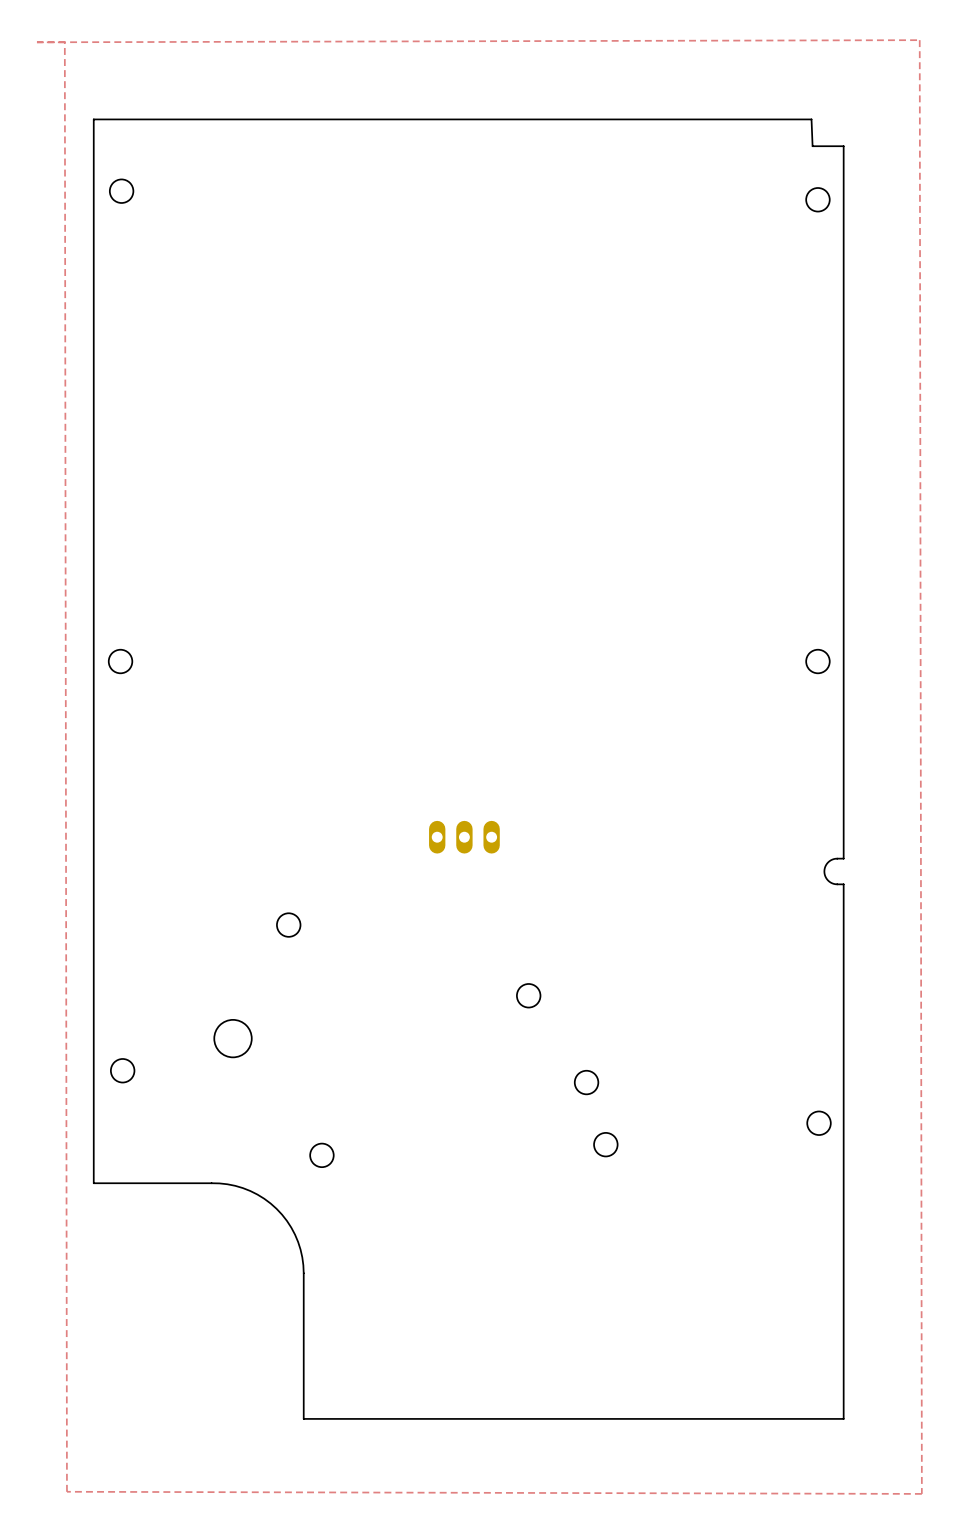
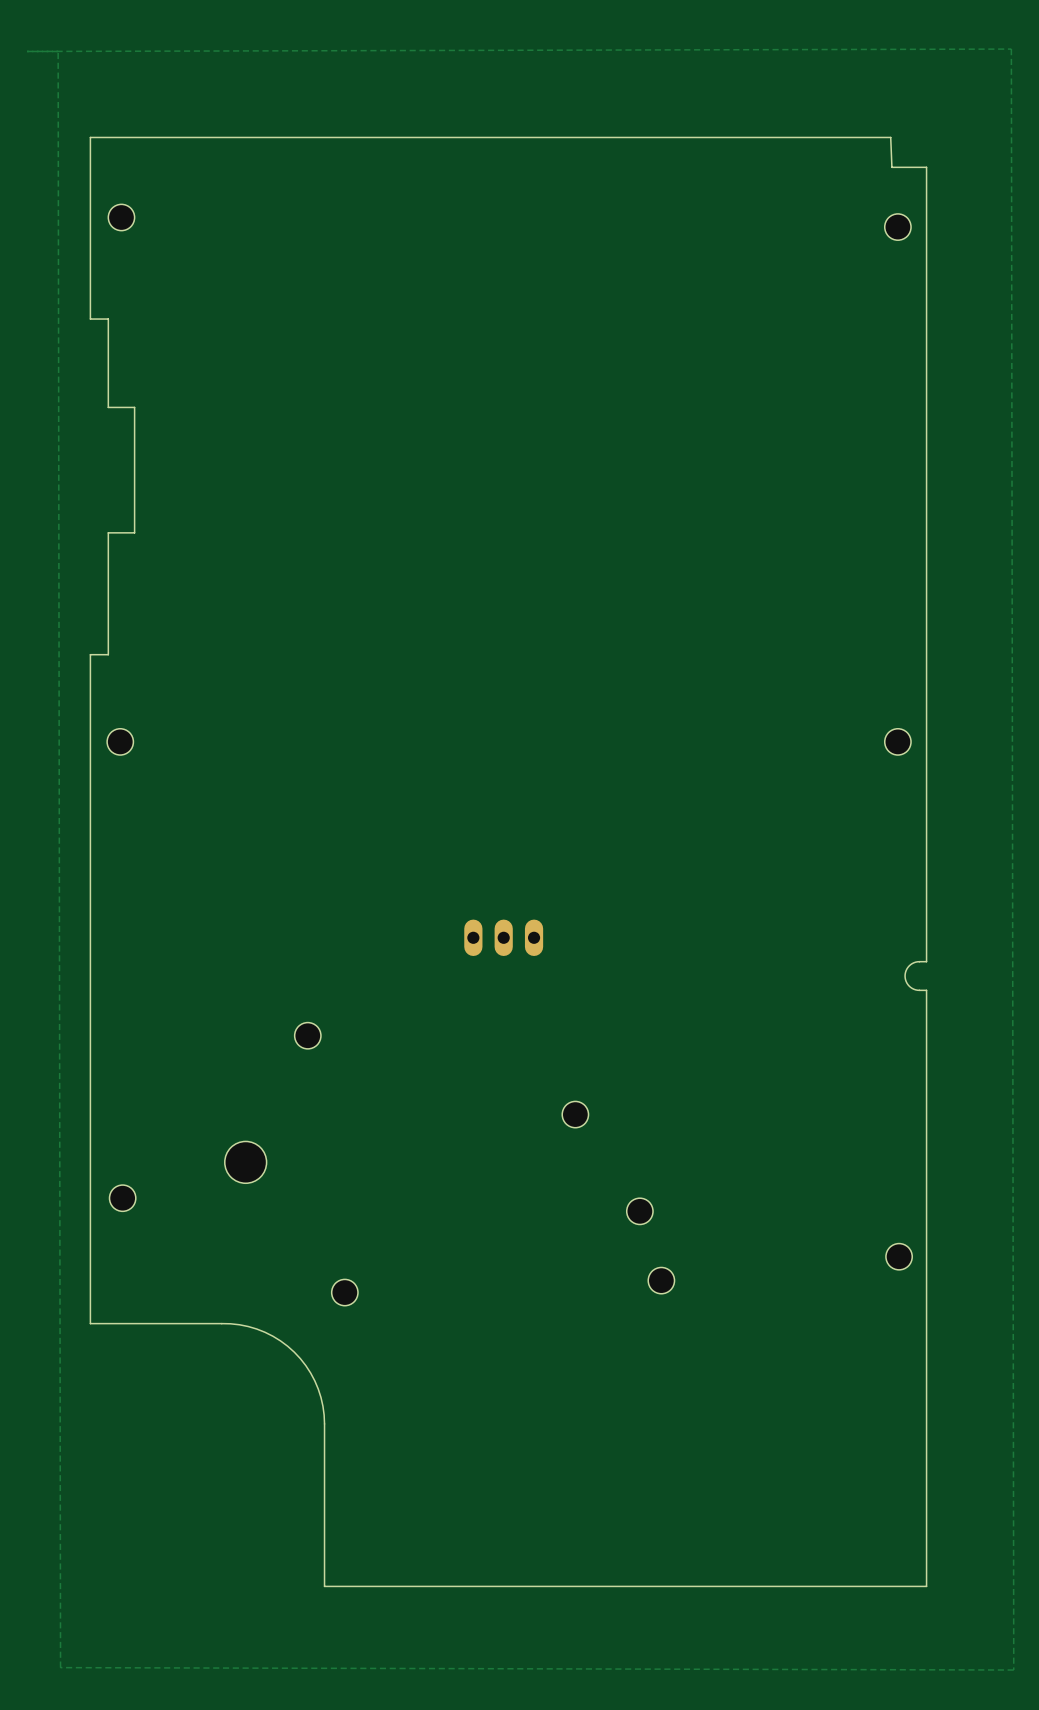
board edge: (93, 282) (93, 583) -> (90, 319) (108, 319) (108, 407) (134, 407) (134, 532) (108, 532) (108, 654) (90, 654)

